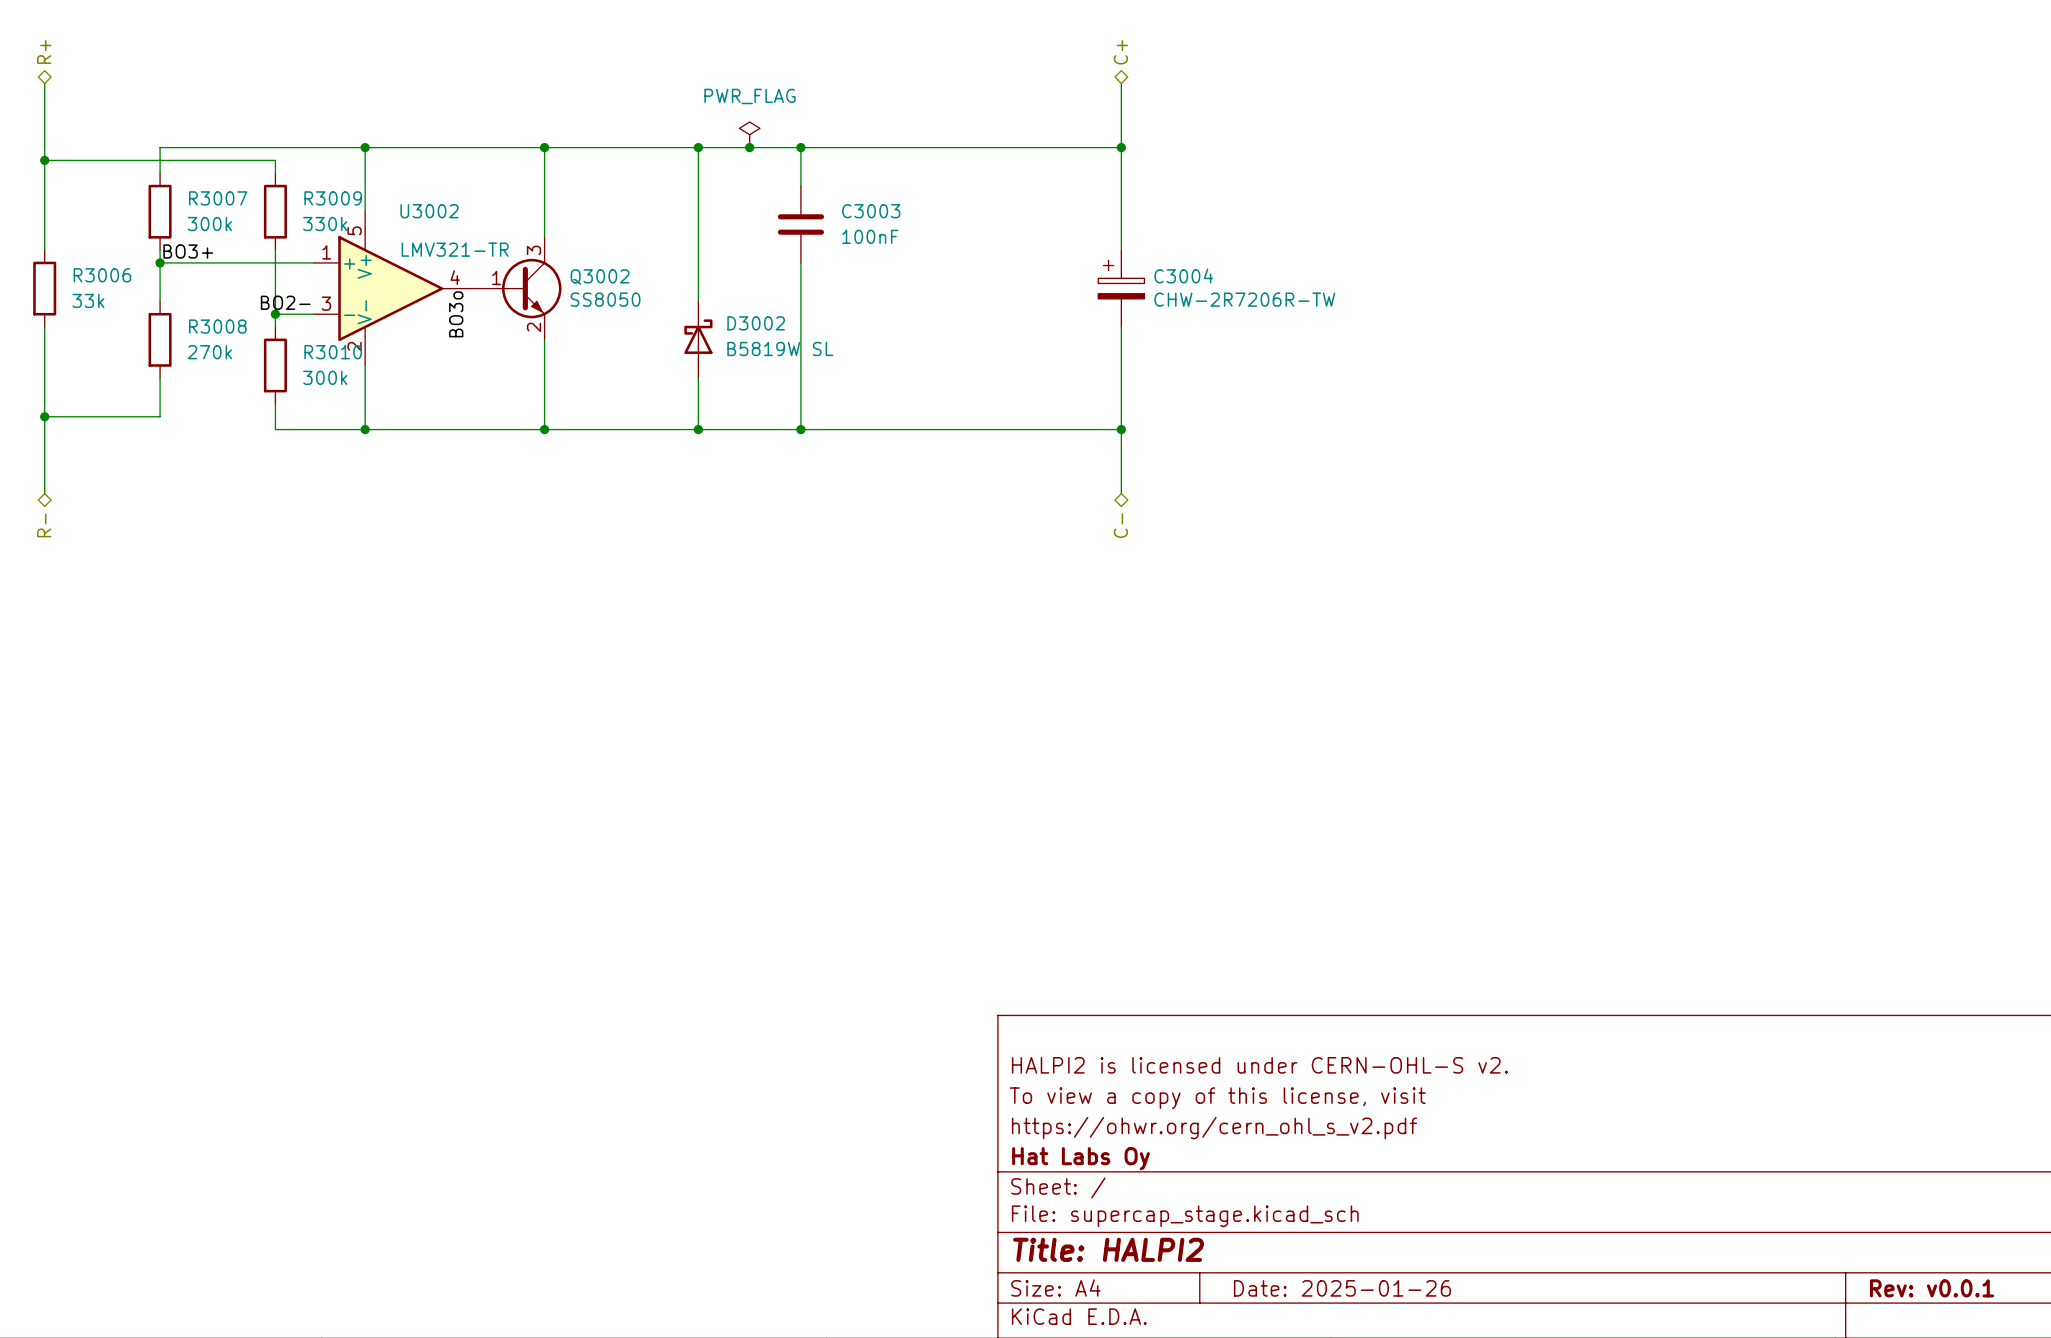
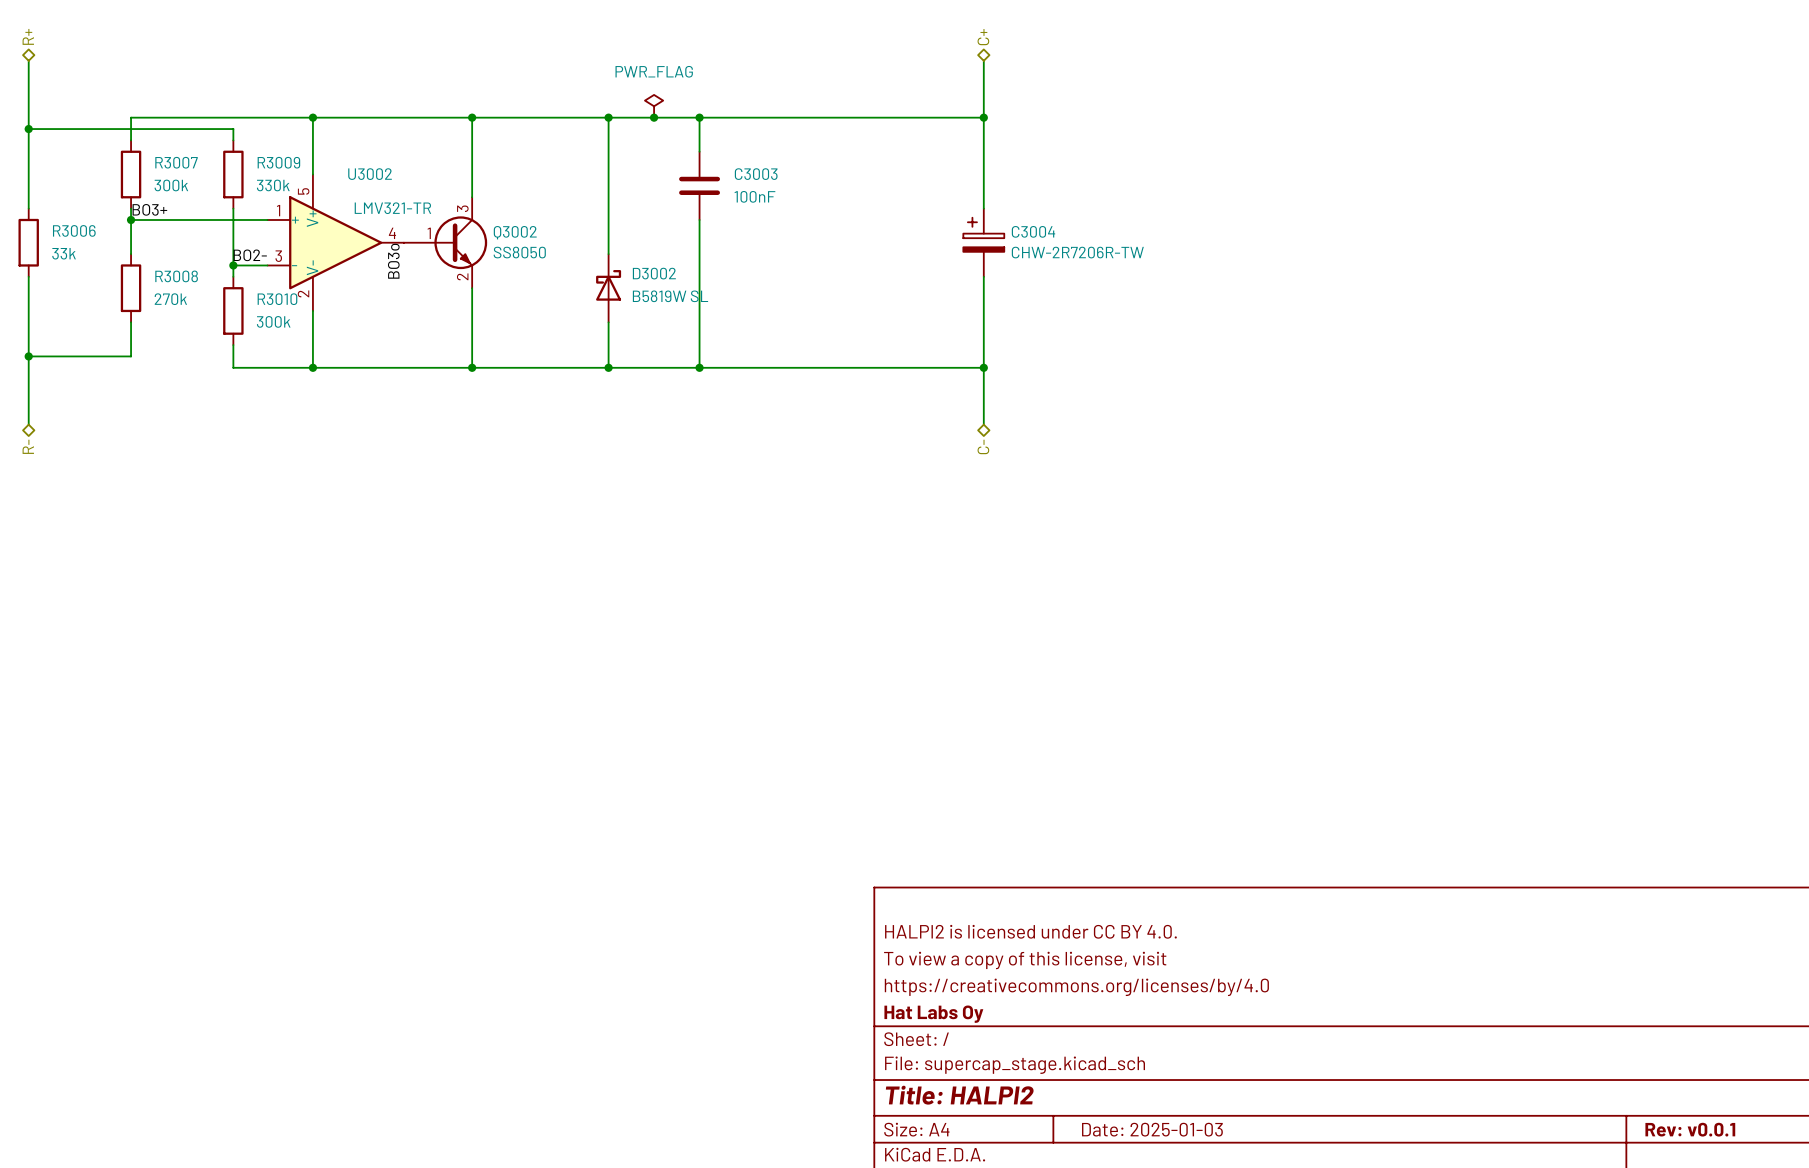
title block: HALPI2 is licensed under CERN-OHL-S v2. (1259, 1065) -> HALPI2 is licensed under CC BY 4.0. (1030, 931)
title block: https://ohwr.org/cern_ohl_s_v2.pdf (1214, 1128) -> https://creativecommons.org/licenses/by/4.0 (1076, 987)
title block: Date: 2025-01-26 (1342, 1288) -> Date: 2025-01-03 (1152, 1129)

